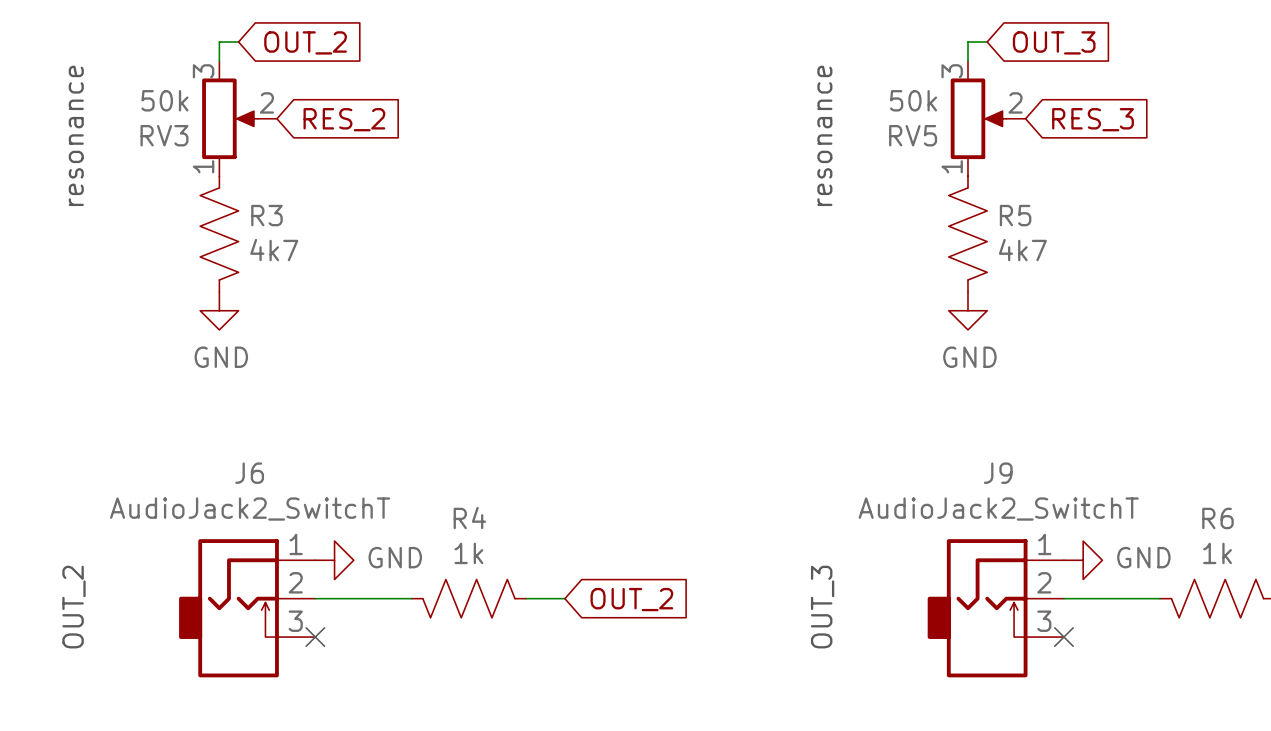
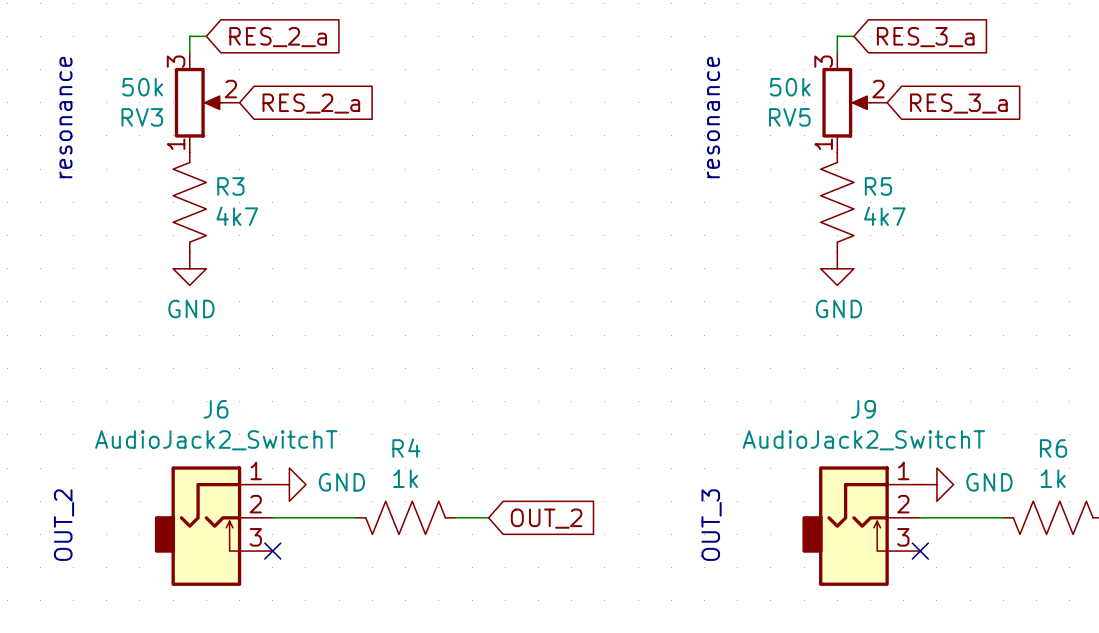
global label: OUT_2 (305, 42) -> RES_2_a (278, 37)
global label: OUT_3 (1054, 42) -> RES_3_a (925, 37)
global label: RES_2 (344, 119) -> RES_2_a (311, 103)
global label: RES_3 (1093, 119) -> RES_3_a (958, 103)

